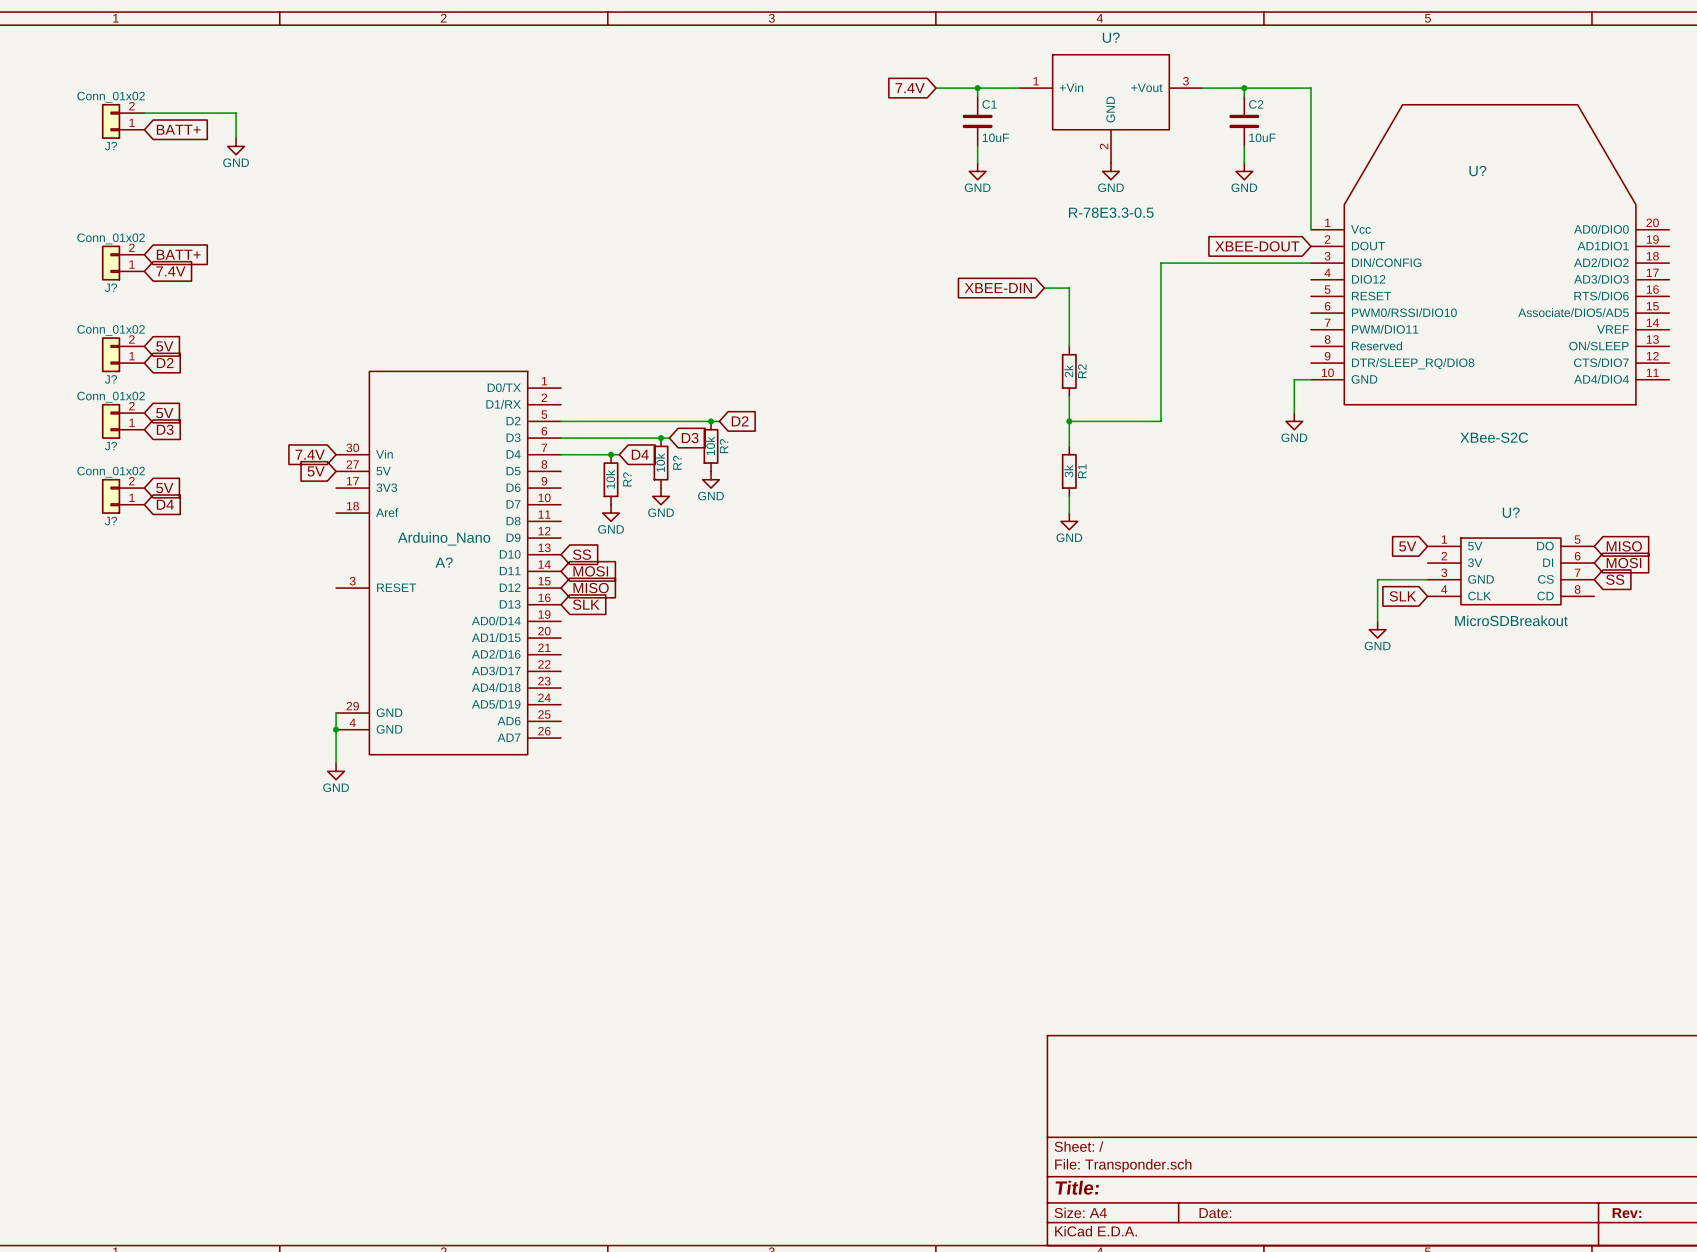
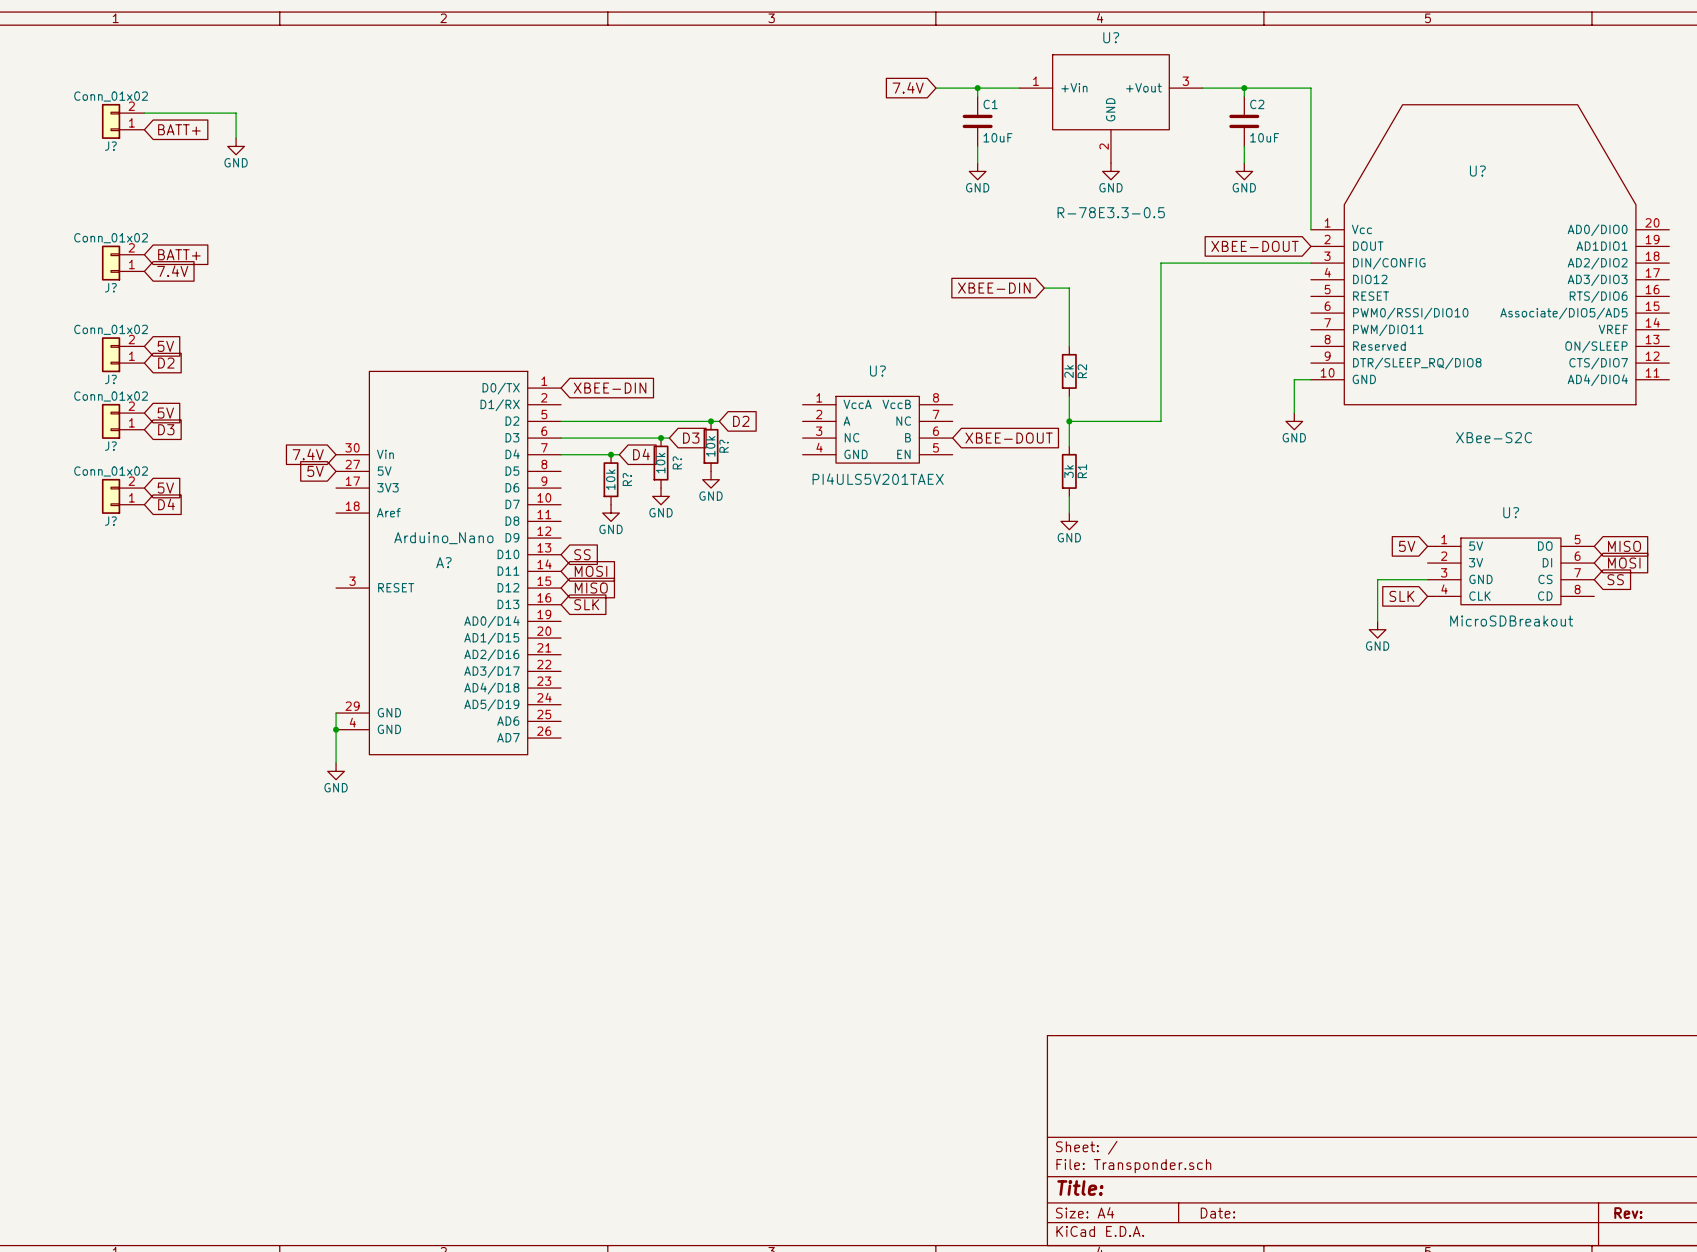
global label: none -> XBEE-DIN (610, 388)
U?: none -> PI4ULS5V201TAEX (877, 429)
global label: none -> XBEE-DOUT (1009, 438)

